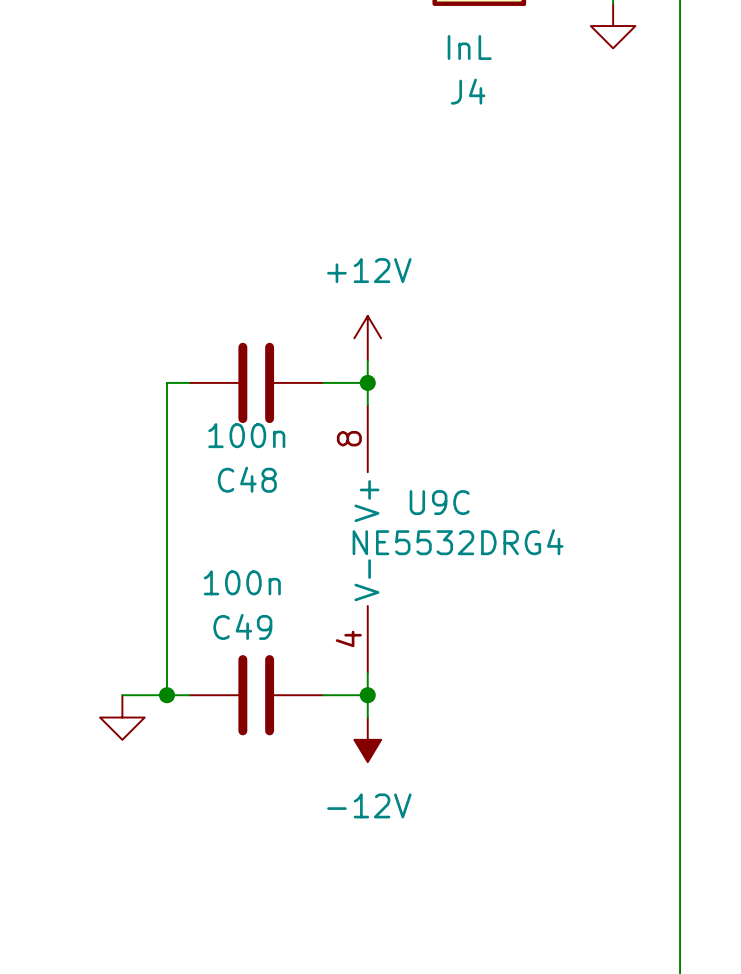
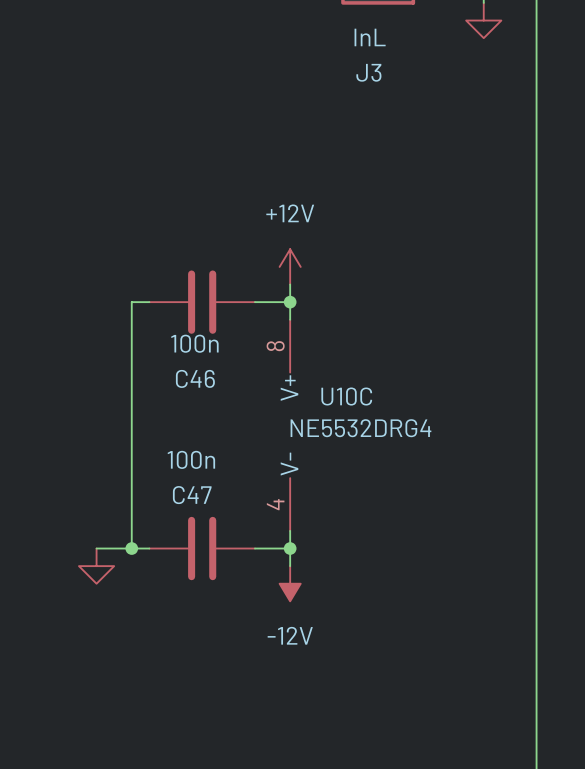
J4 name: J4 (468, 91) -> J3 (368, 72)
C48 name: C48 (247, 479) -> C46 (195, 378)
U9C name: U9C (439, 502) -> U10C (346, 396)
C49 name: C49 (242, 626) -> C47 (192, 495)

